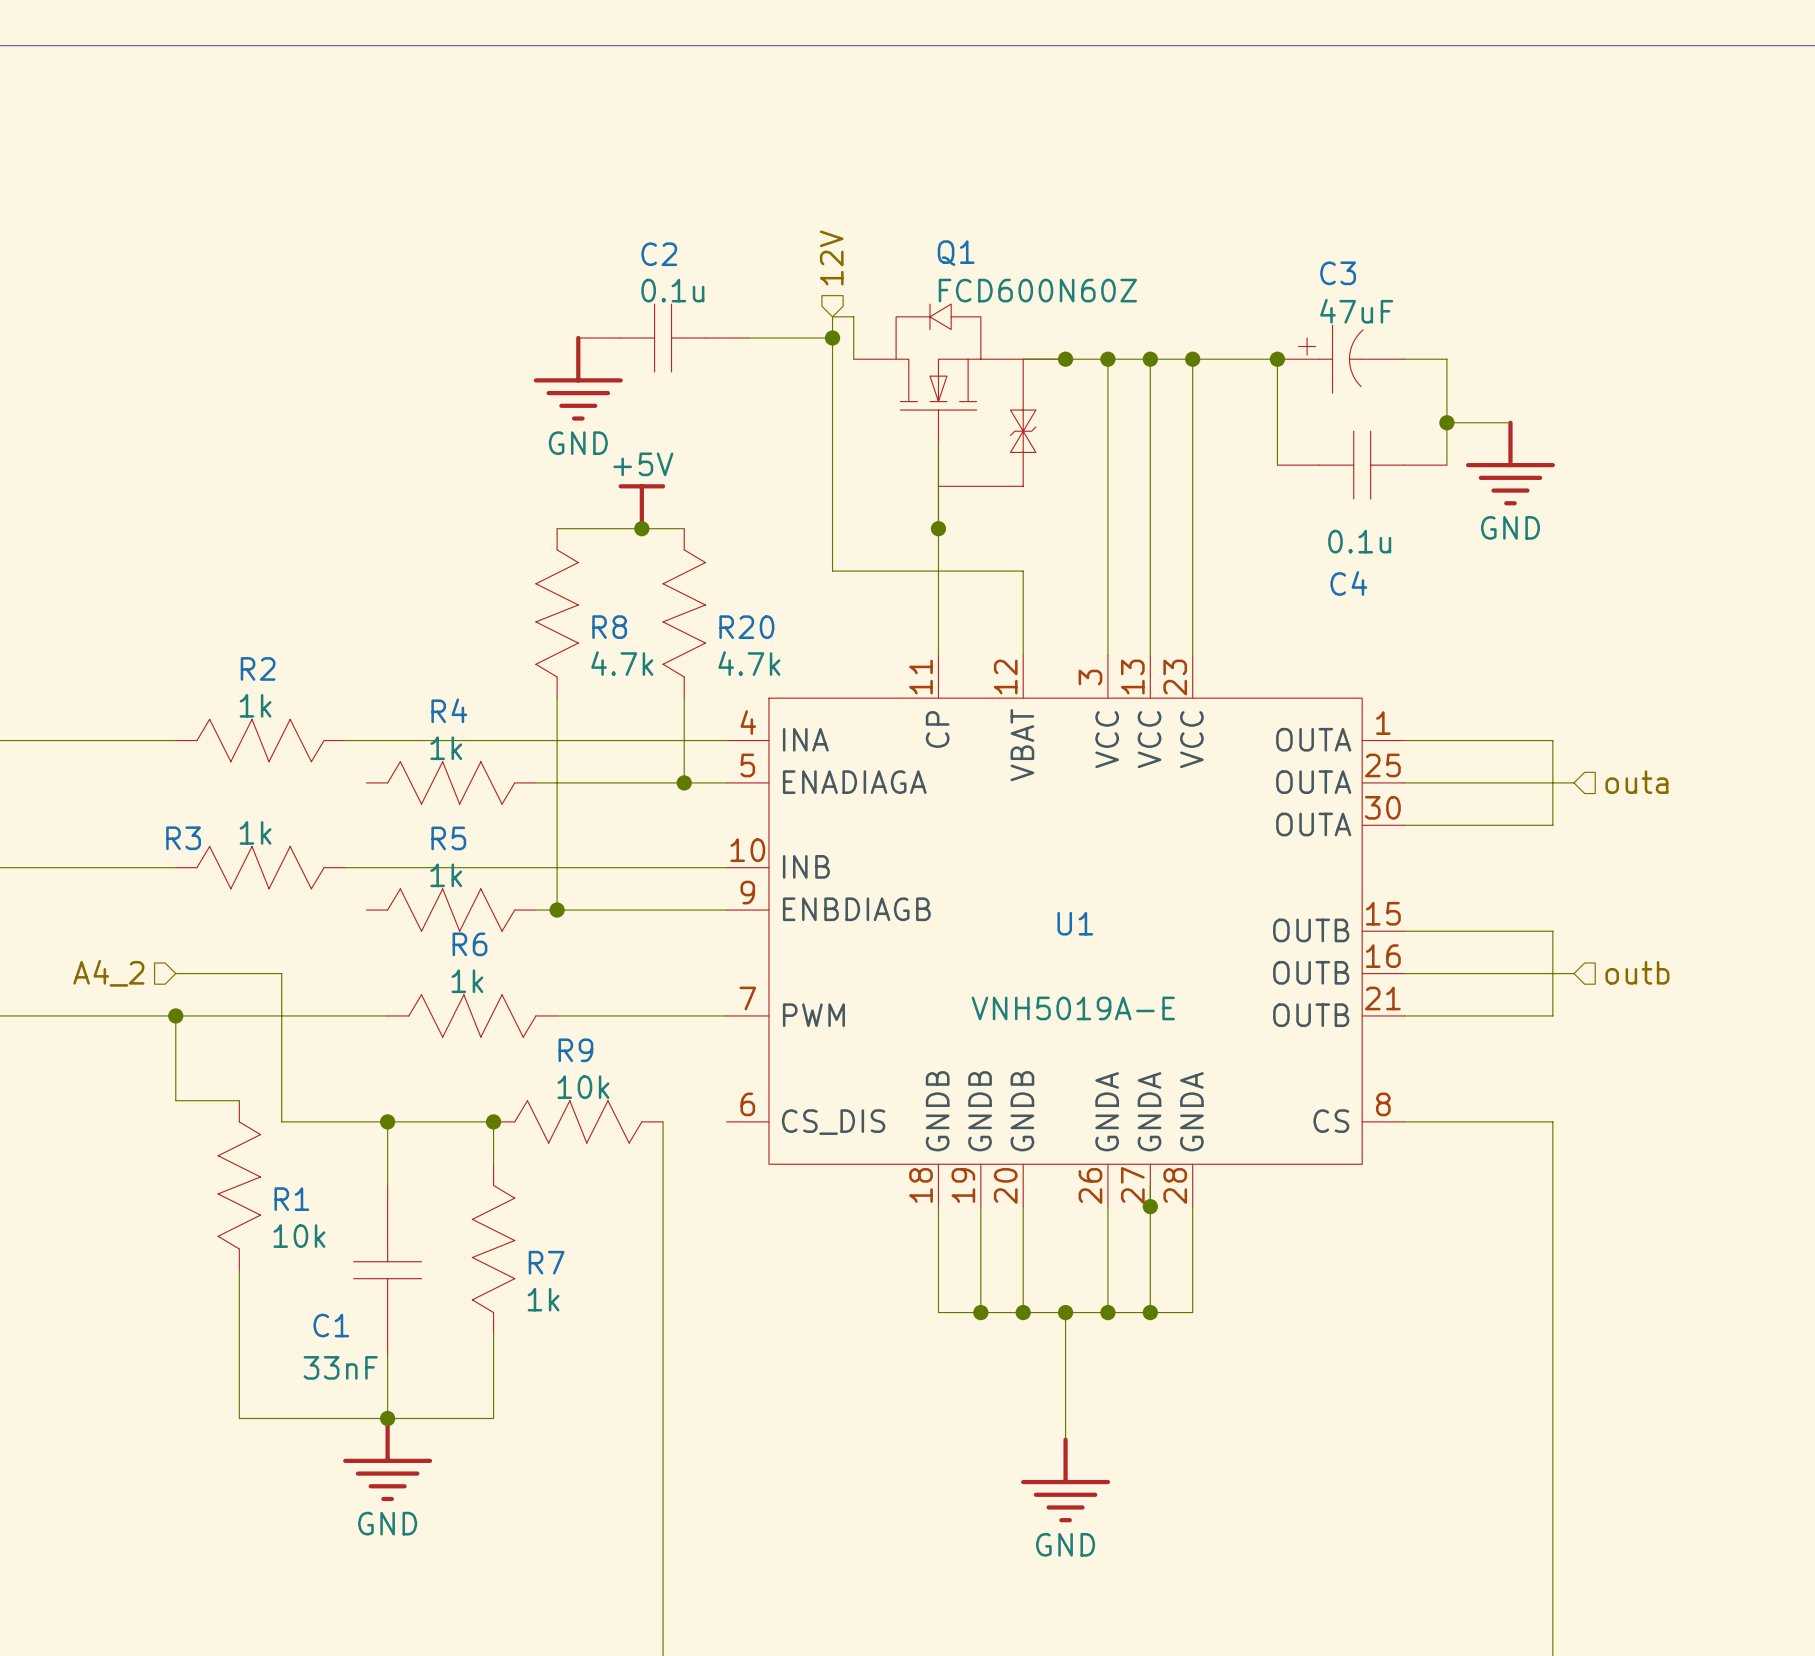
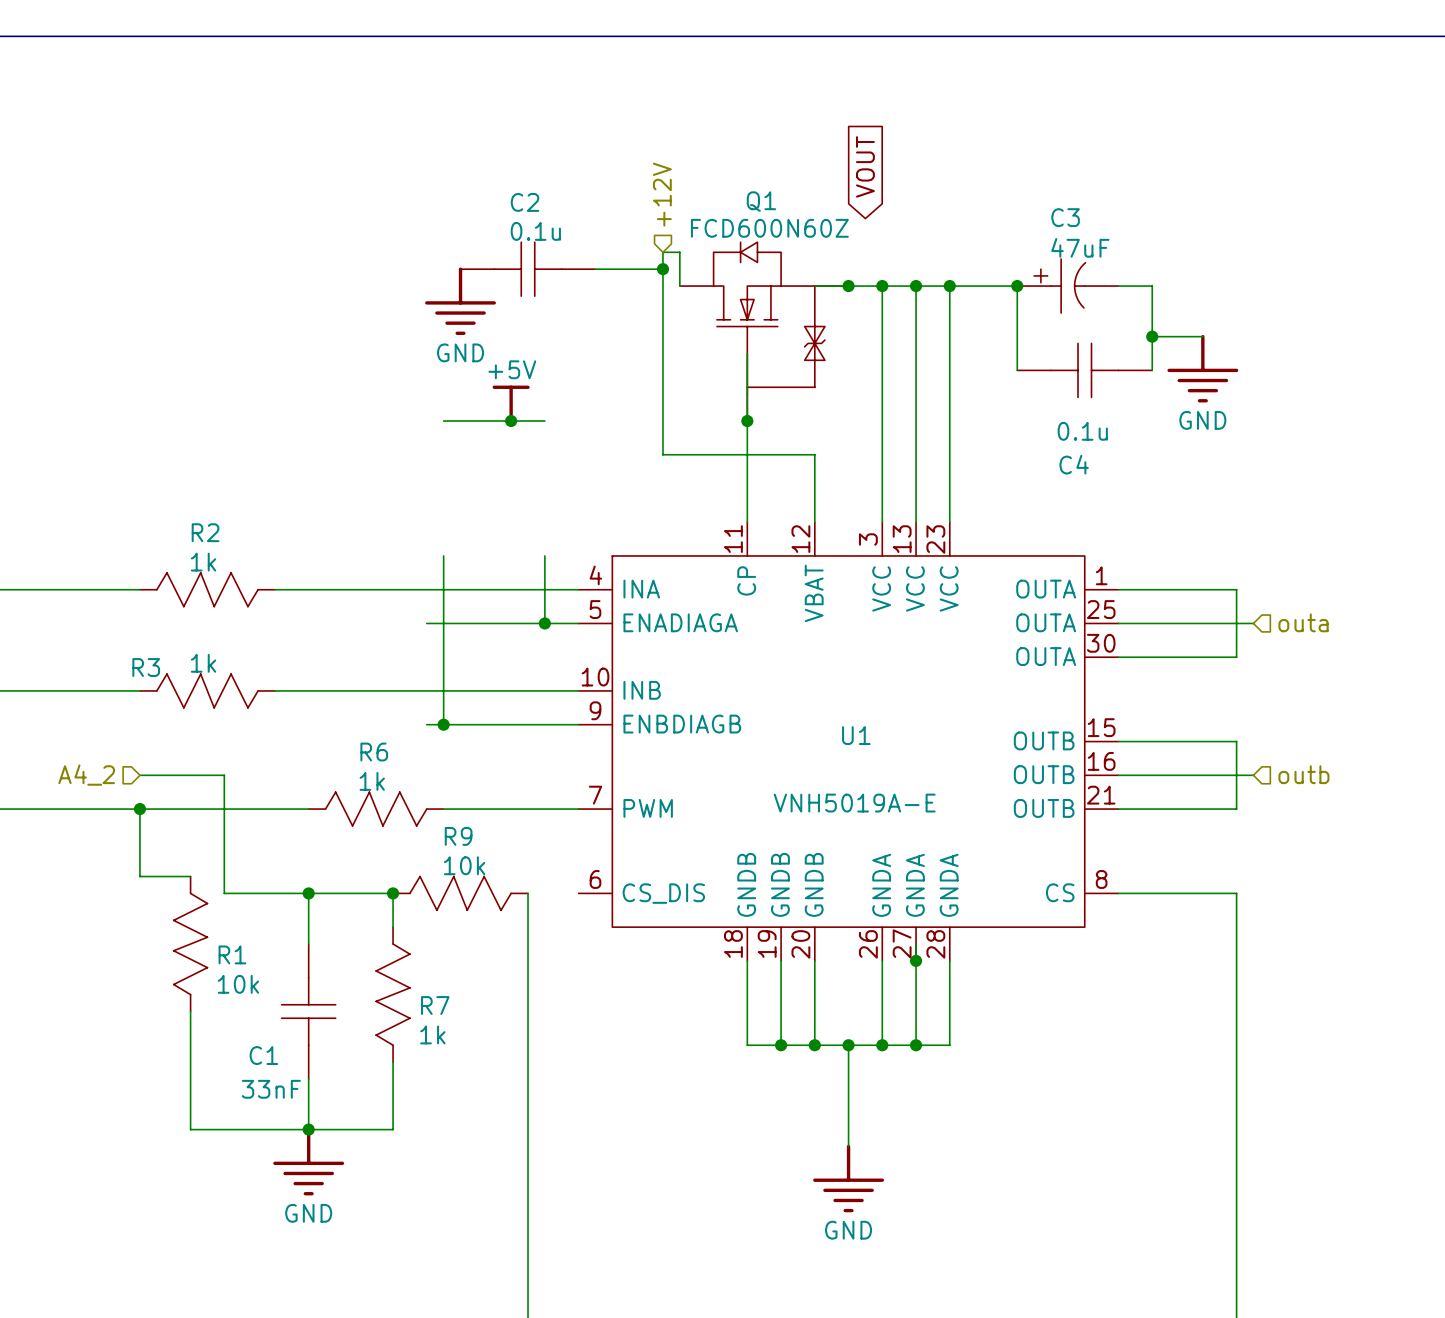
global label: none -> VOUT (865, 166)
hierarchical label: 12V (831, 257) -> +12V (662, 194)
Q1 value position: FCD600N60Z (1037, 290) -> FCD600N60Z (769, 228)
R8: 4.7k (557, 613) -> none
R20: 4.7k (684, 613) -> none
R4: 1k (451, 782) -> none
R5: 1k (451, 910) -> none

